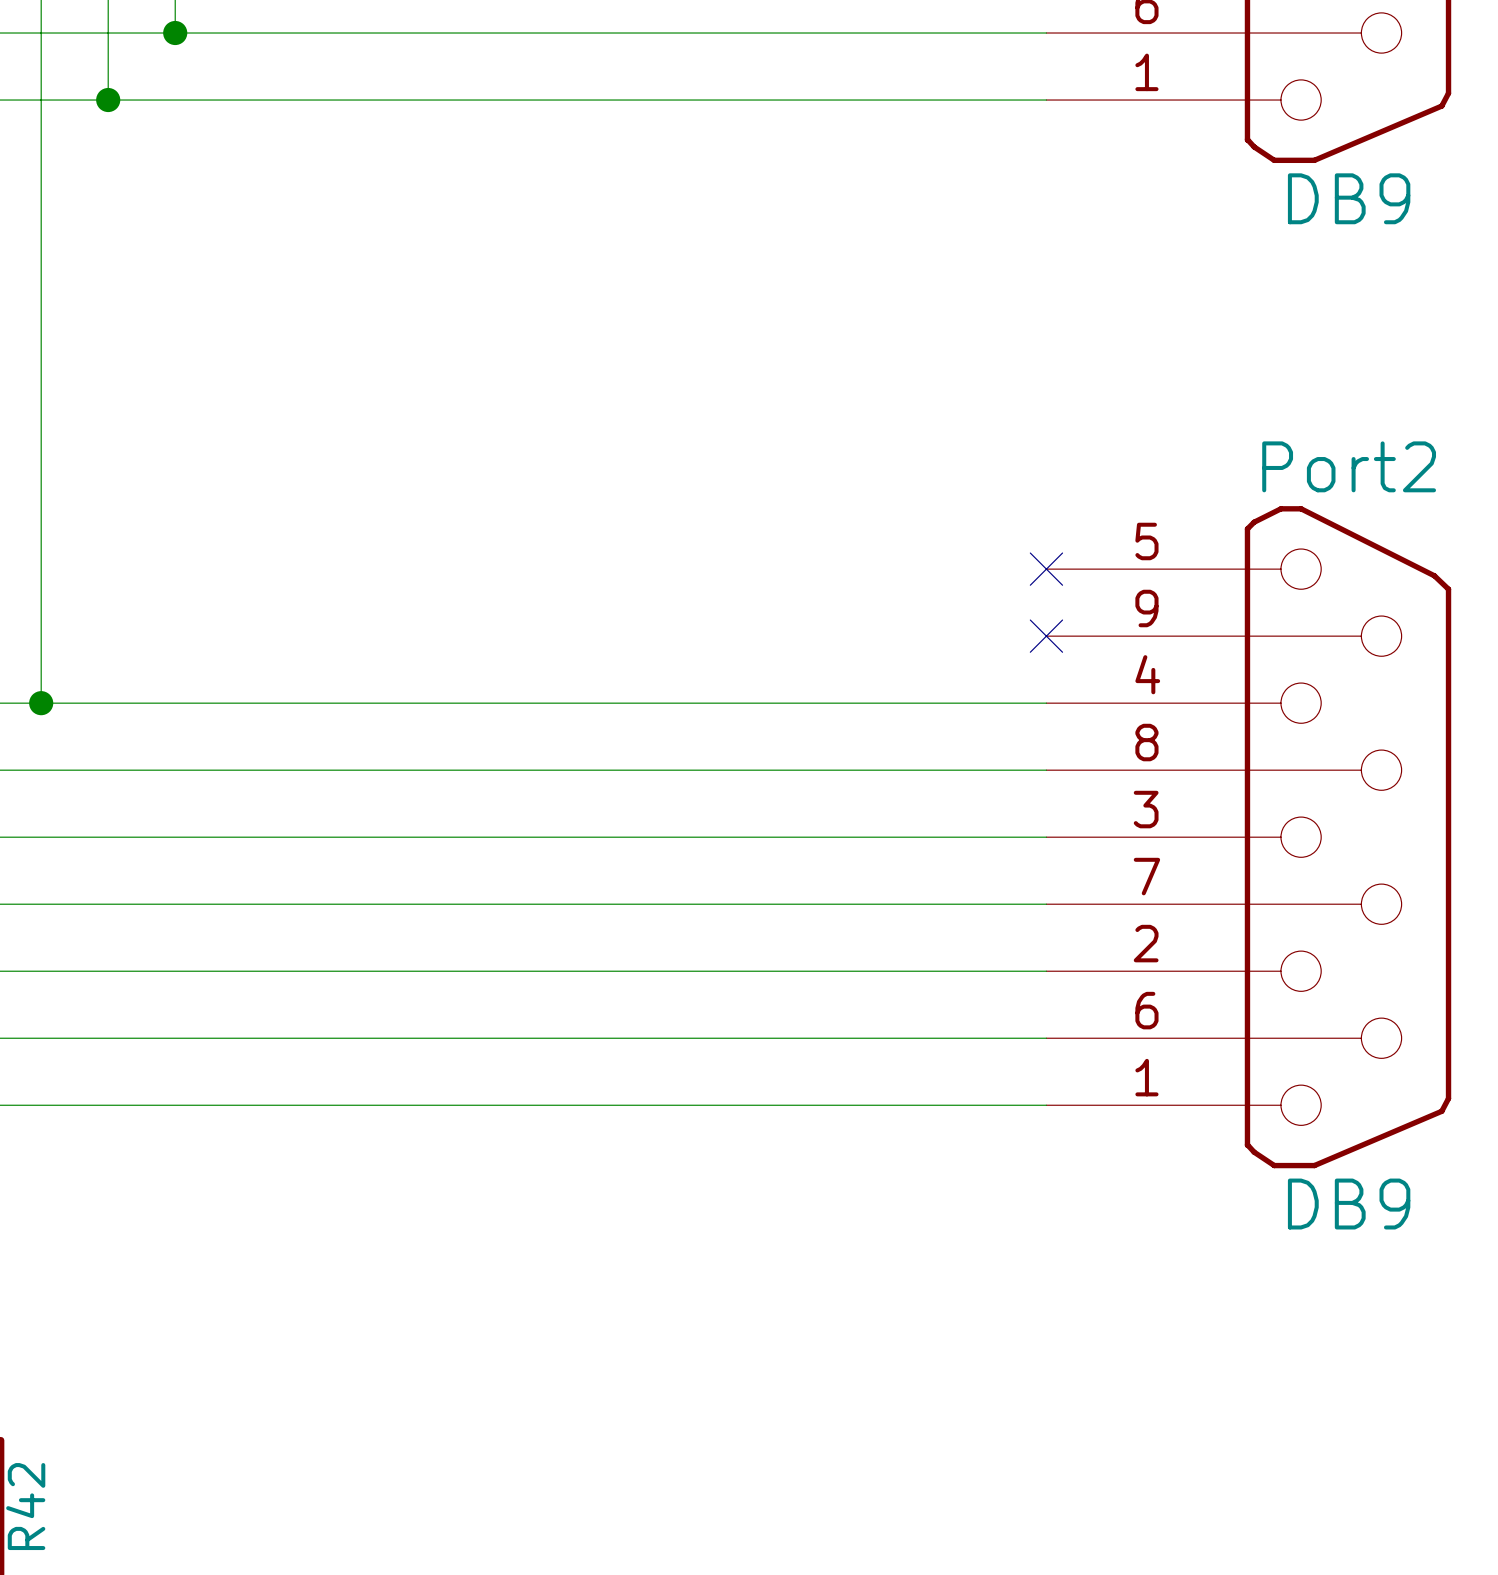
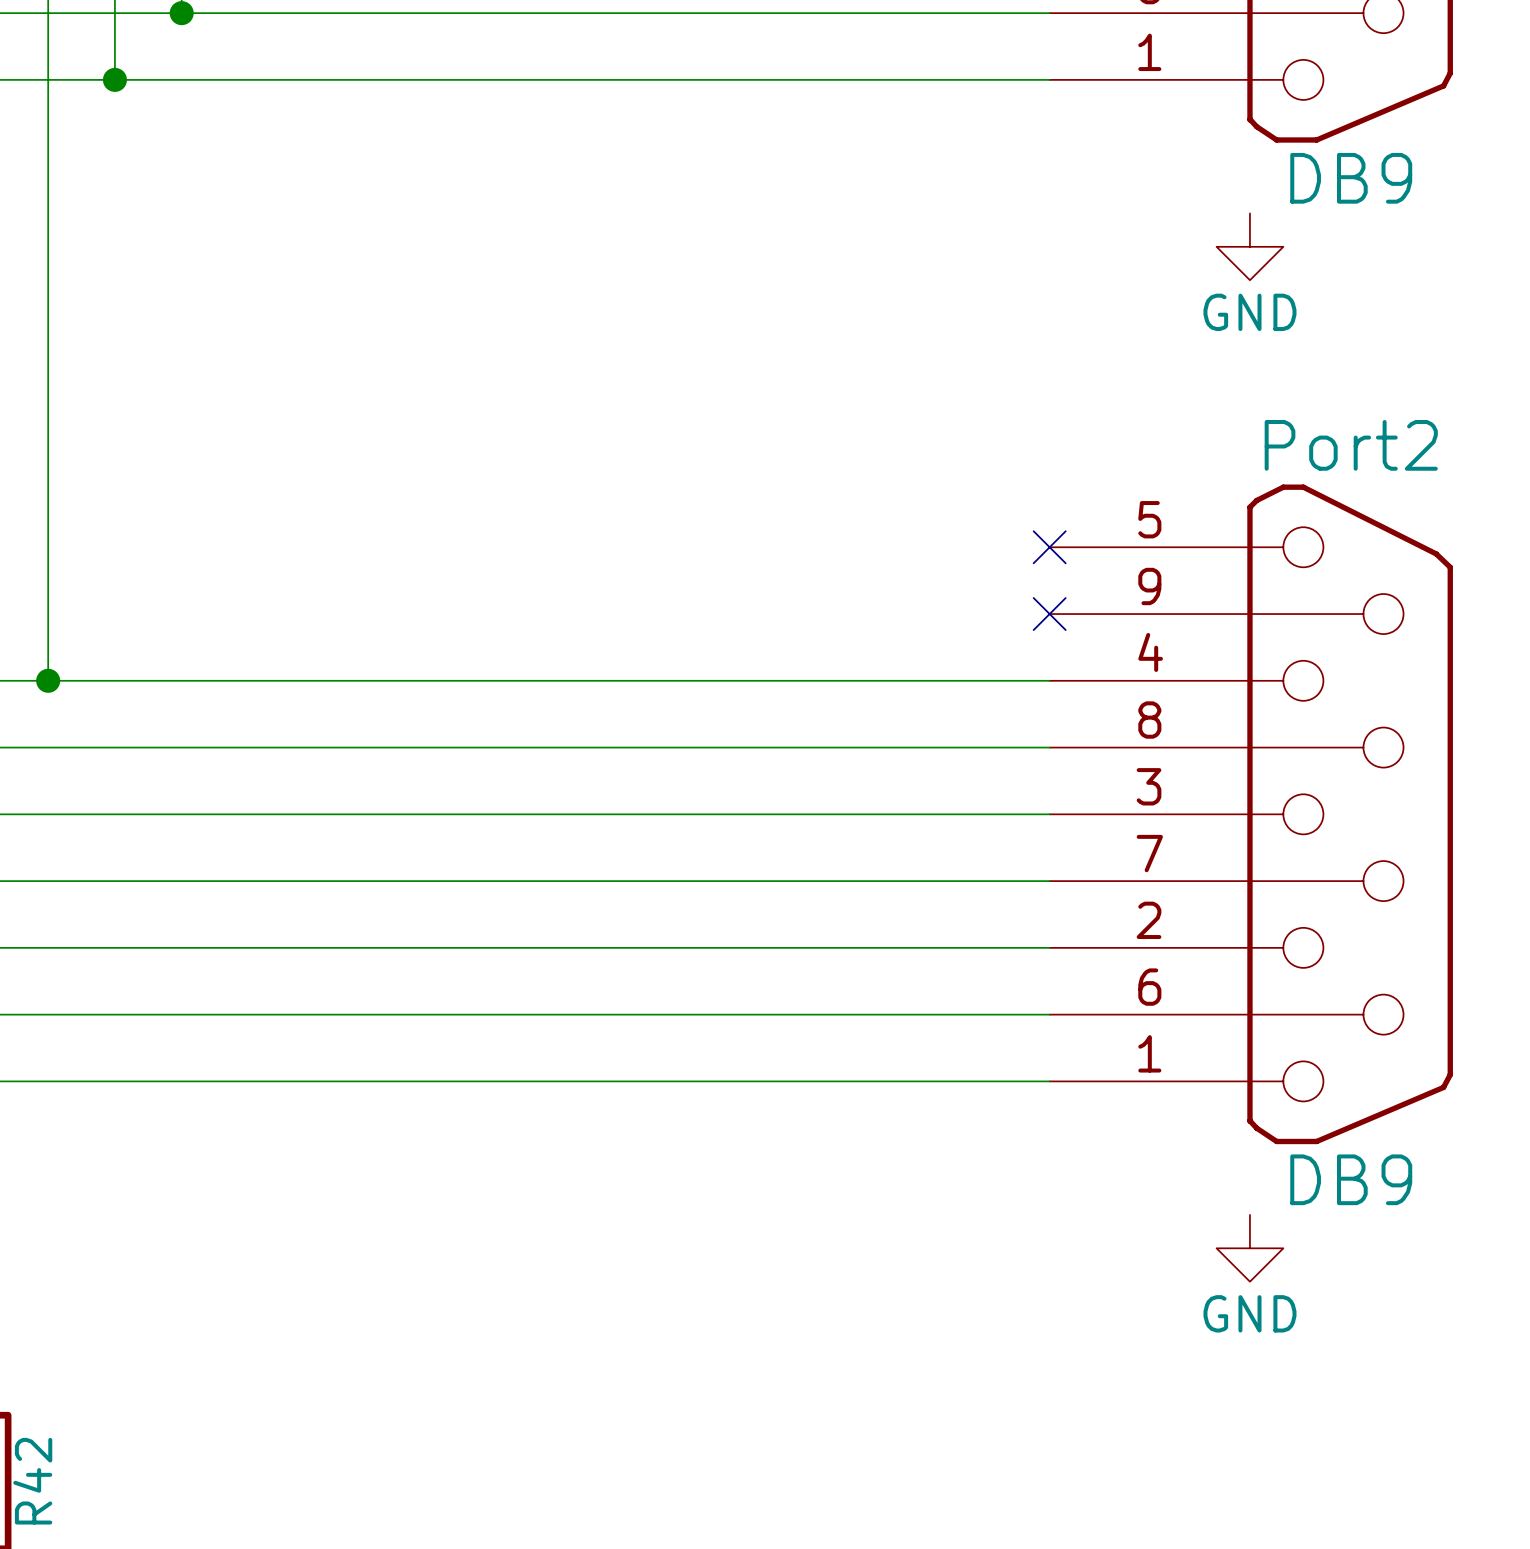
power symbol: none -> GND (1249, 246)
power symbol: none -> GND (1249, 1248)

